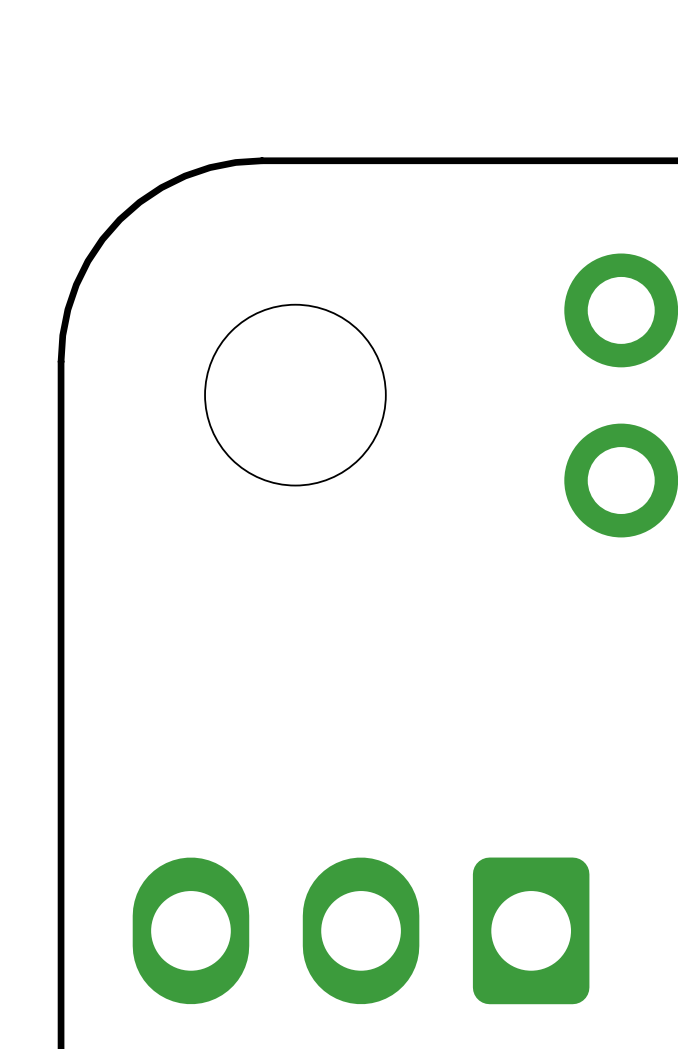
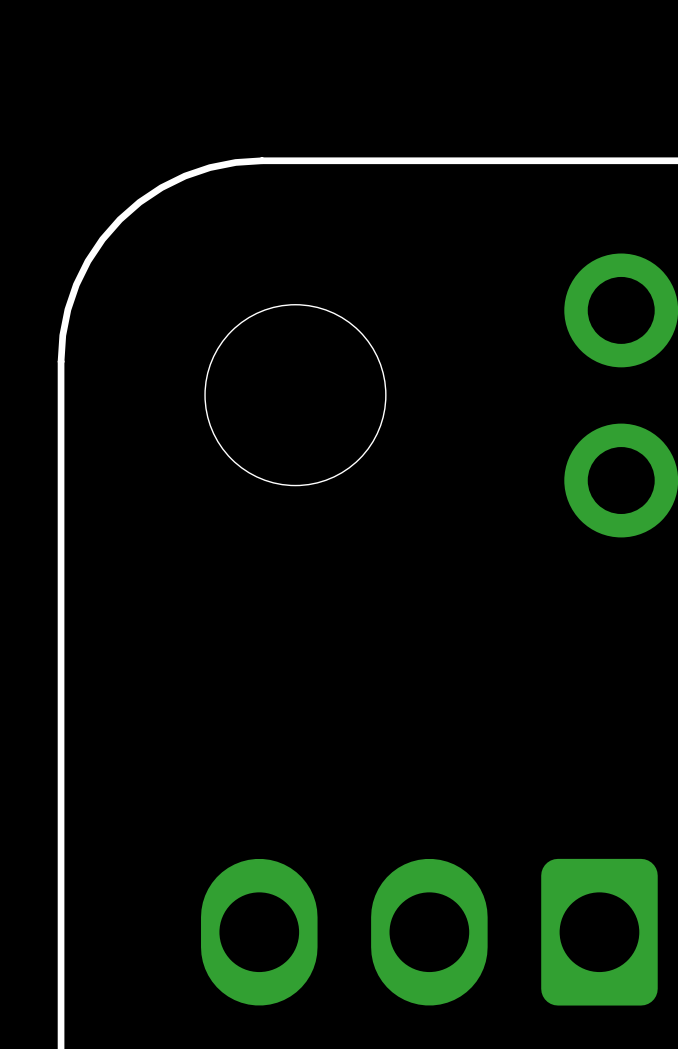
part position: (361, 930) -> (429, 932)

